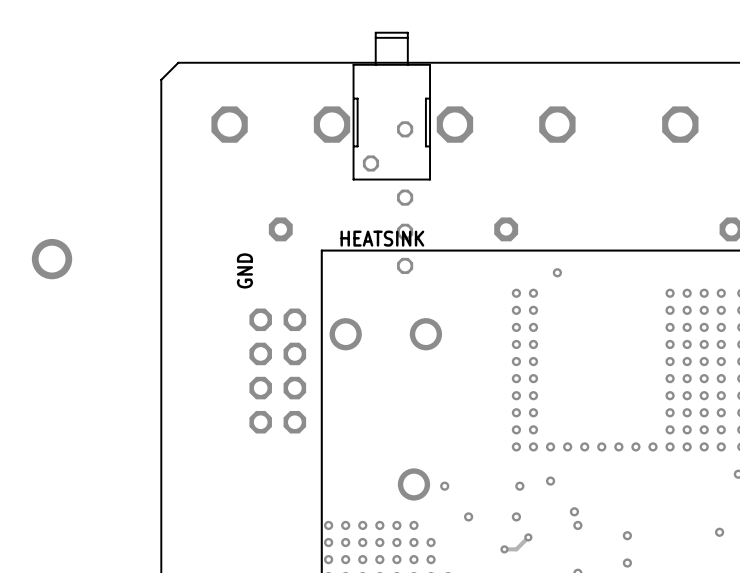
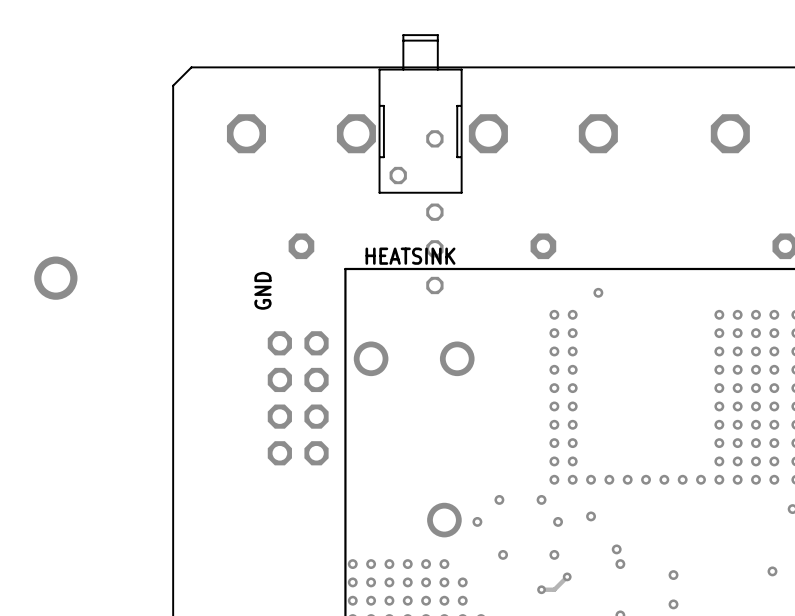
via: none -> (499, 499)
via: none -> (541, 499)

